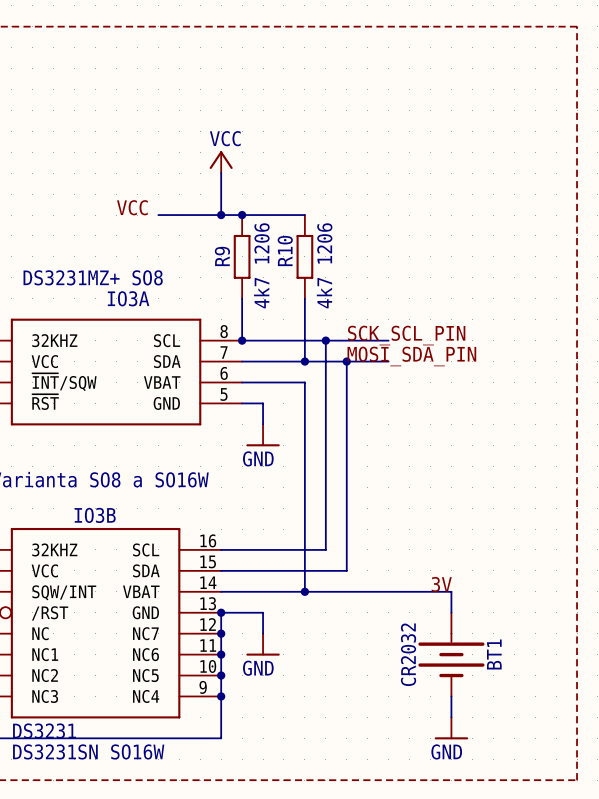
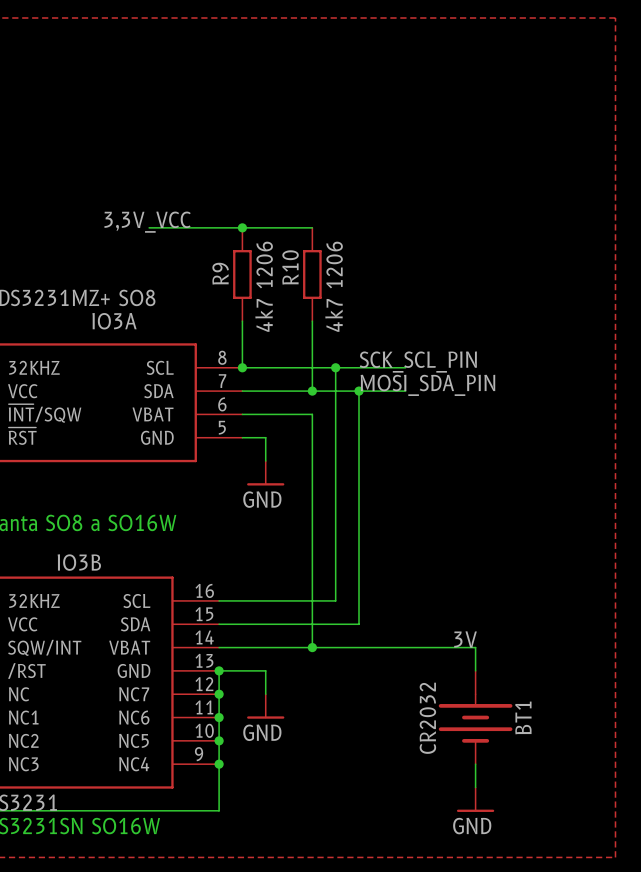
power symbol: VCC (221, 162) -> none
wire: (221, 173) (221, 215) -> none
label: VCC (132, 207) -> 3,3V_VCC (147, 222)
junction: (221, 215) -> none

